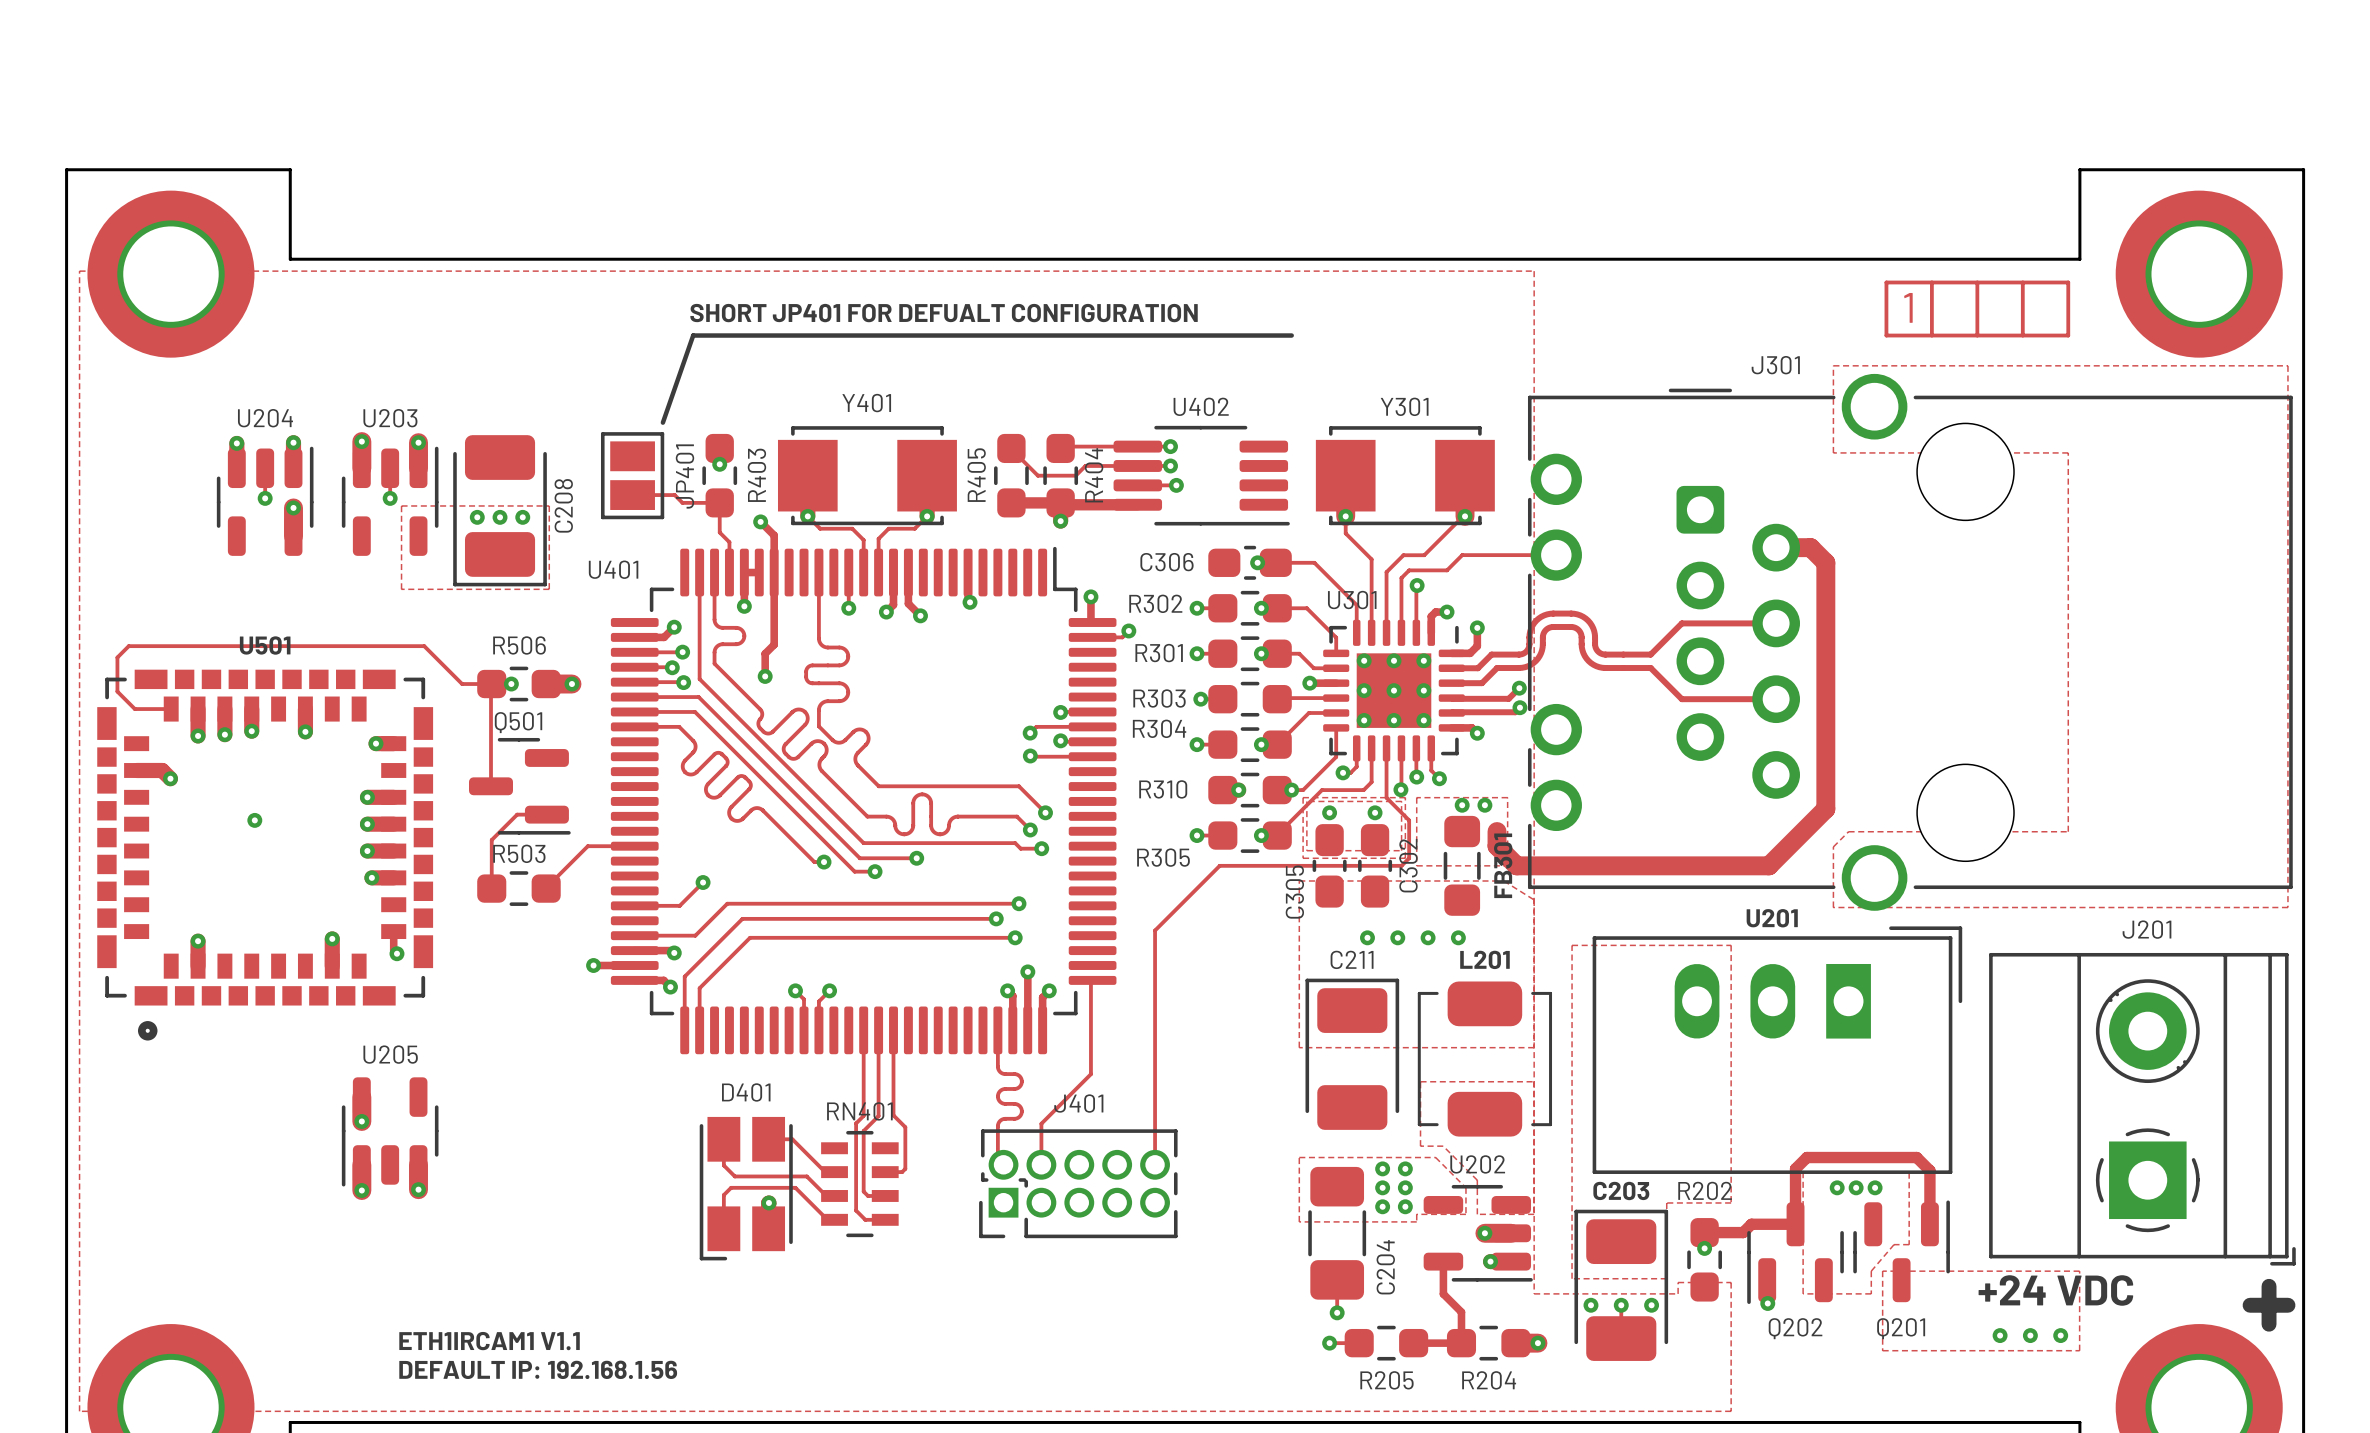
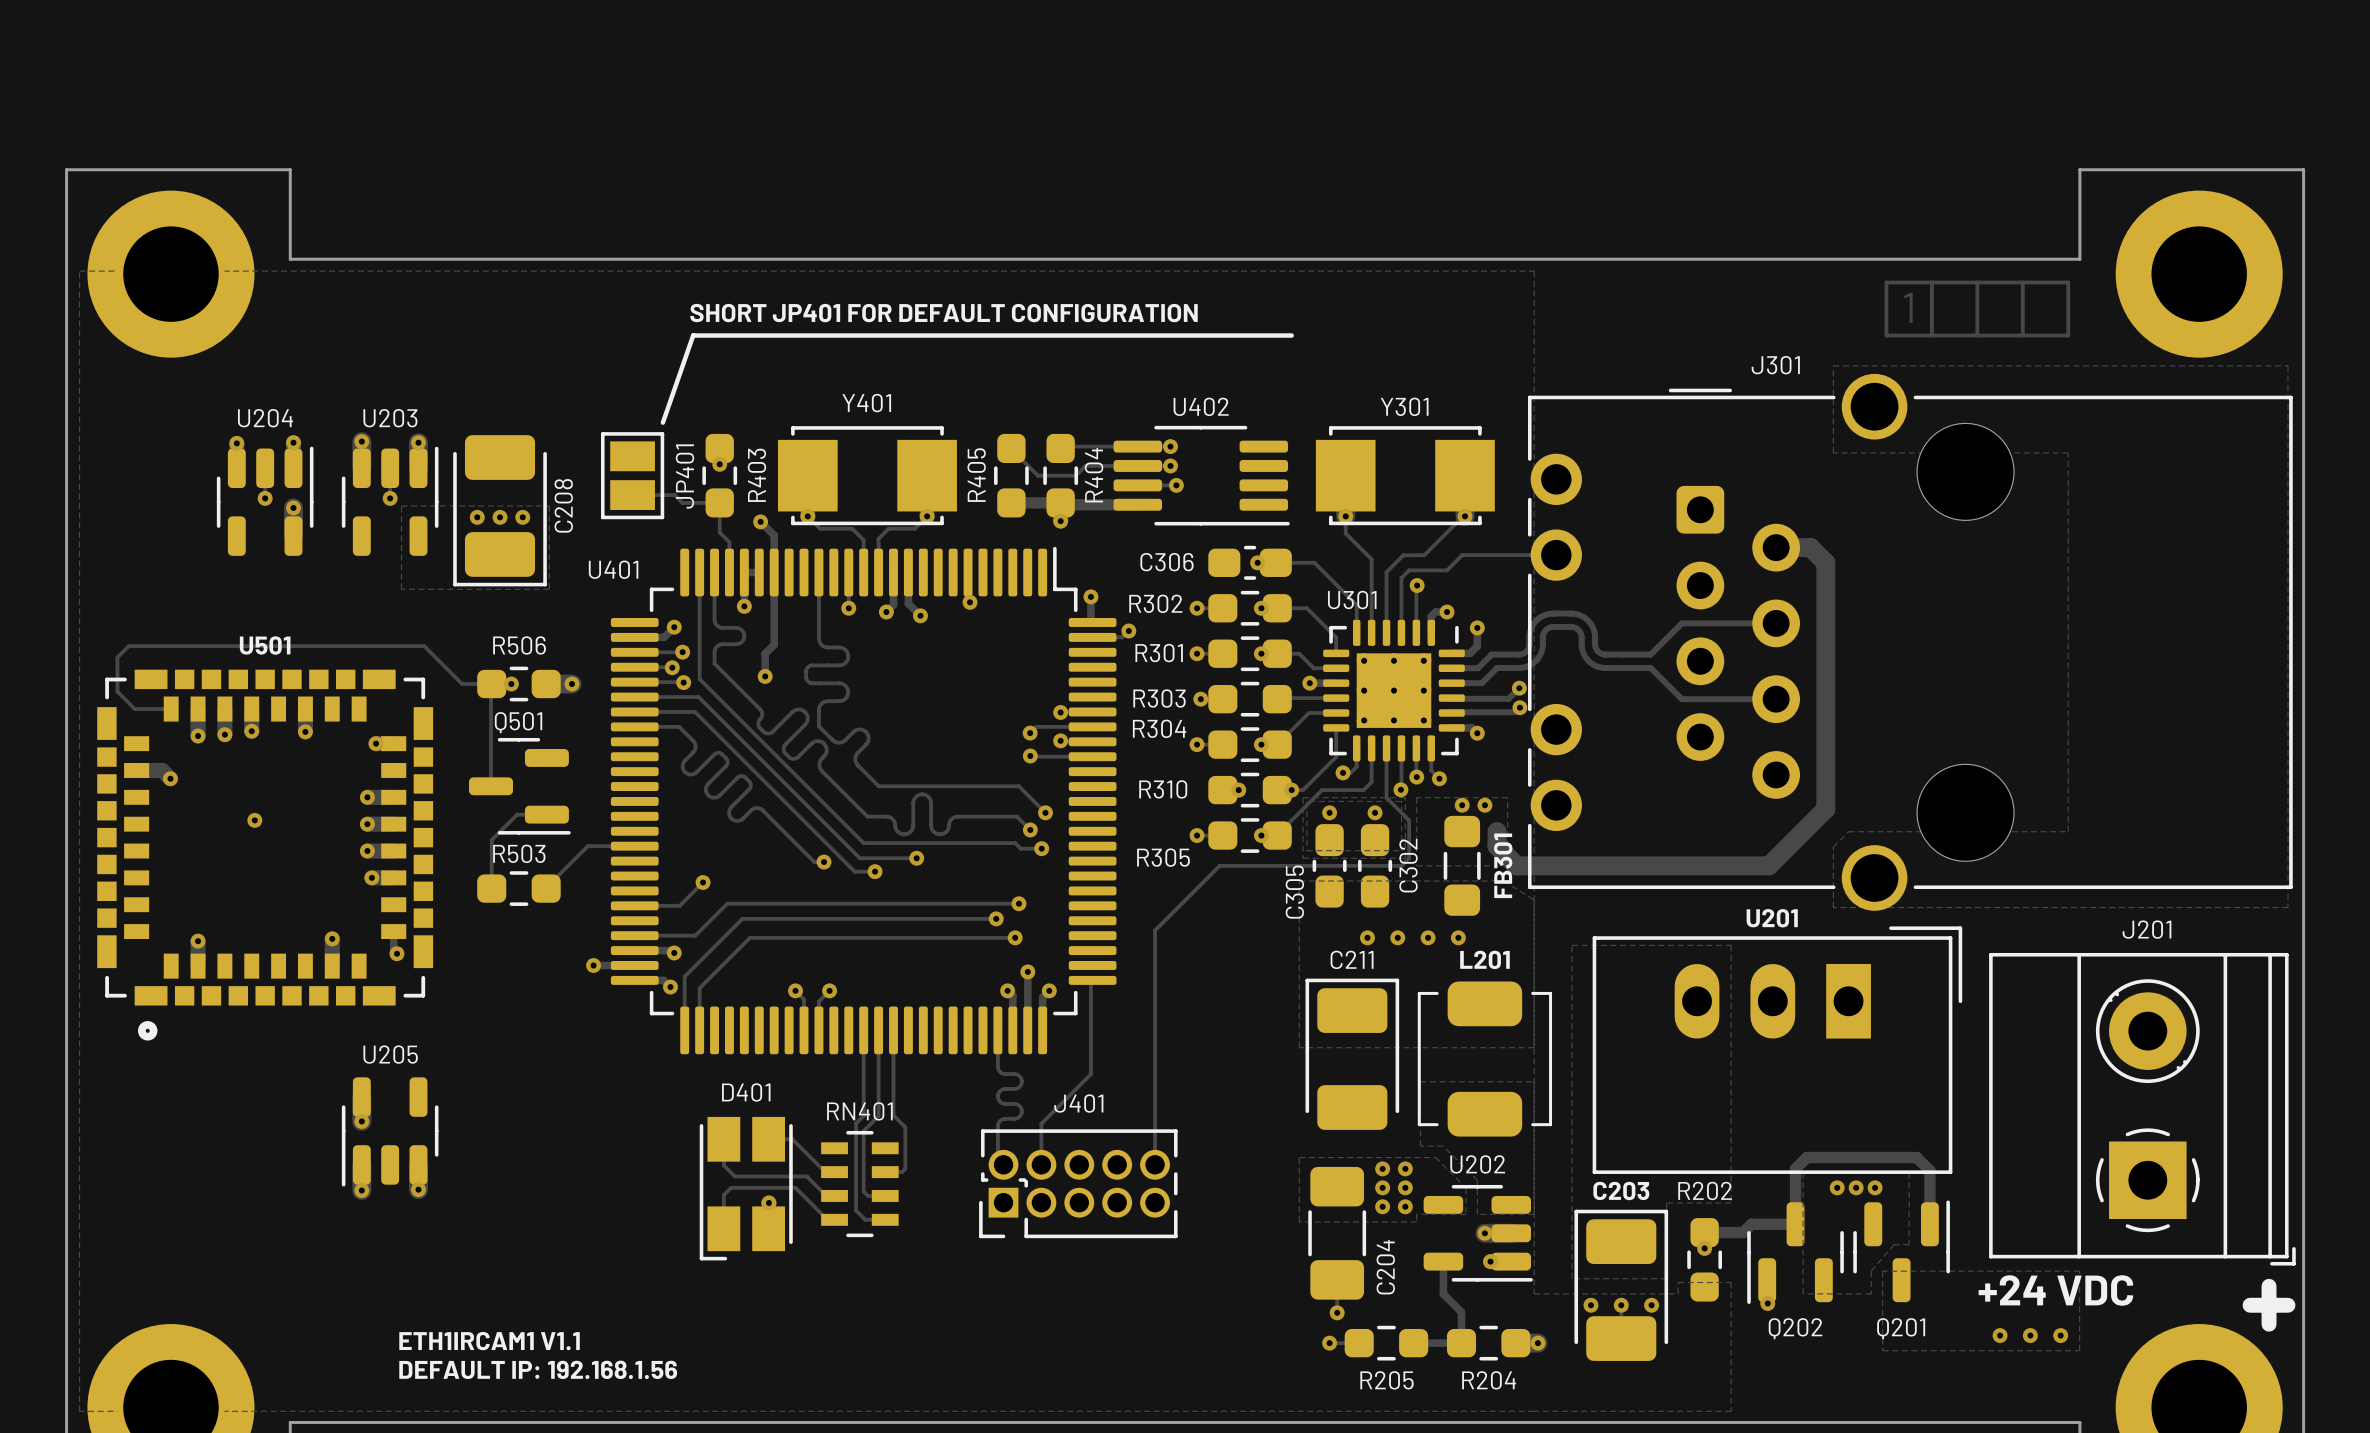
text: SHORT JP401 FOR DEFUALT CONFIGURATION (944, 313) -> SHORT JP401 FOR DEFAULT CONFIGURATION (944, 313)

